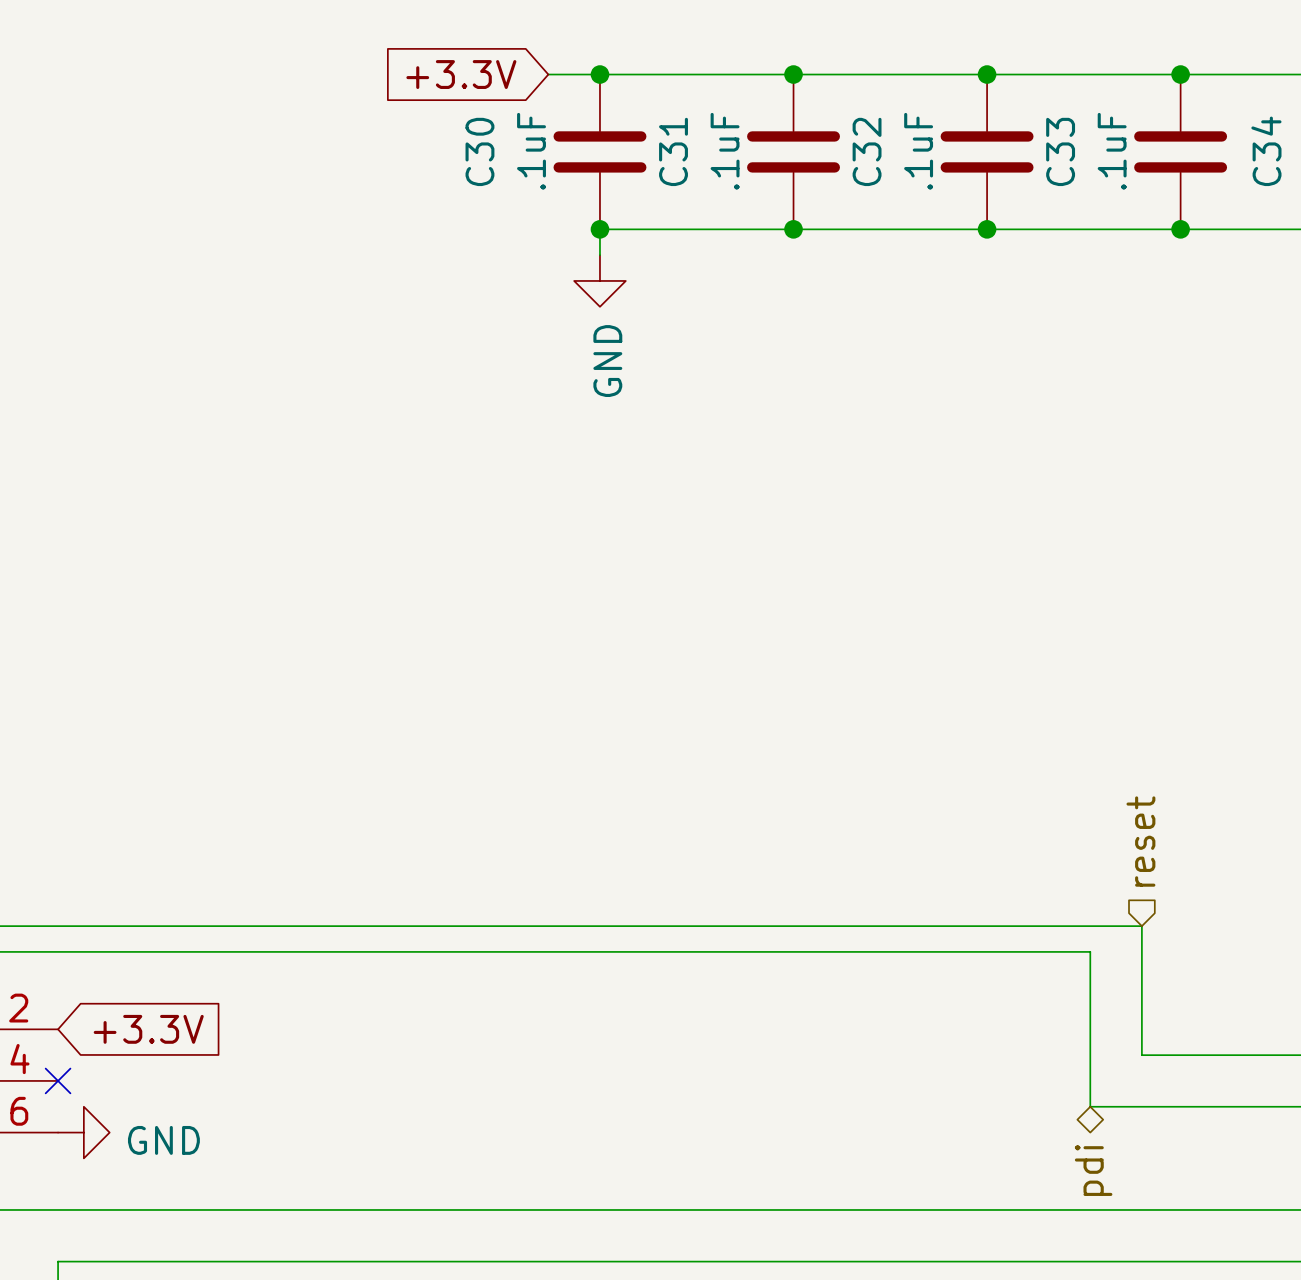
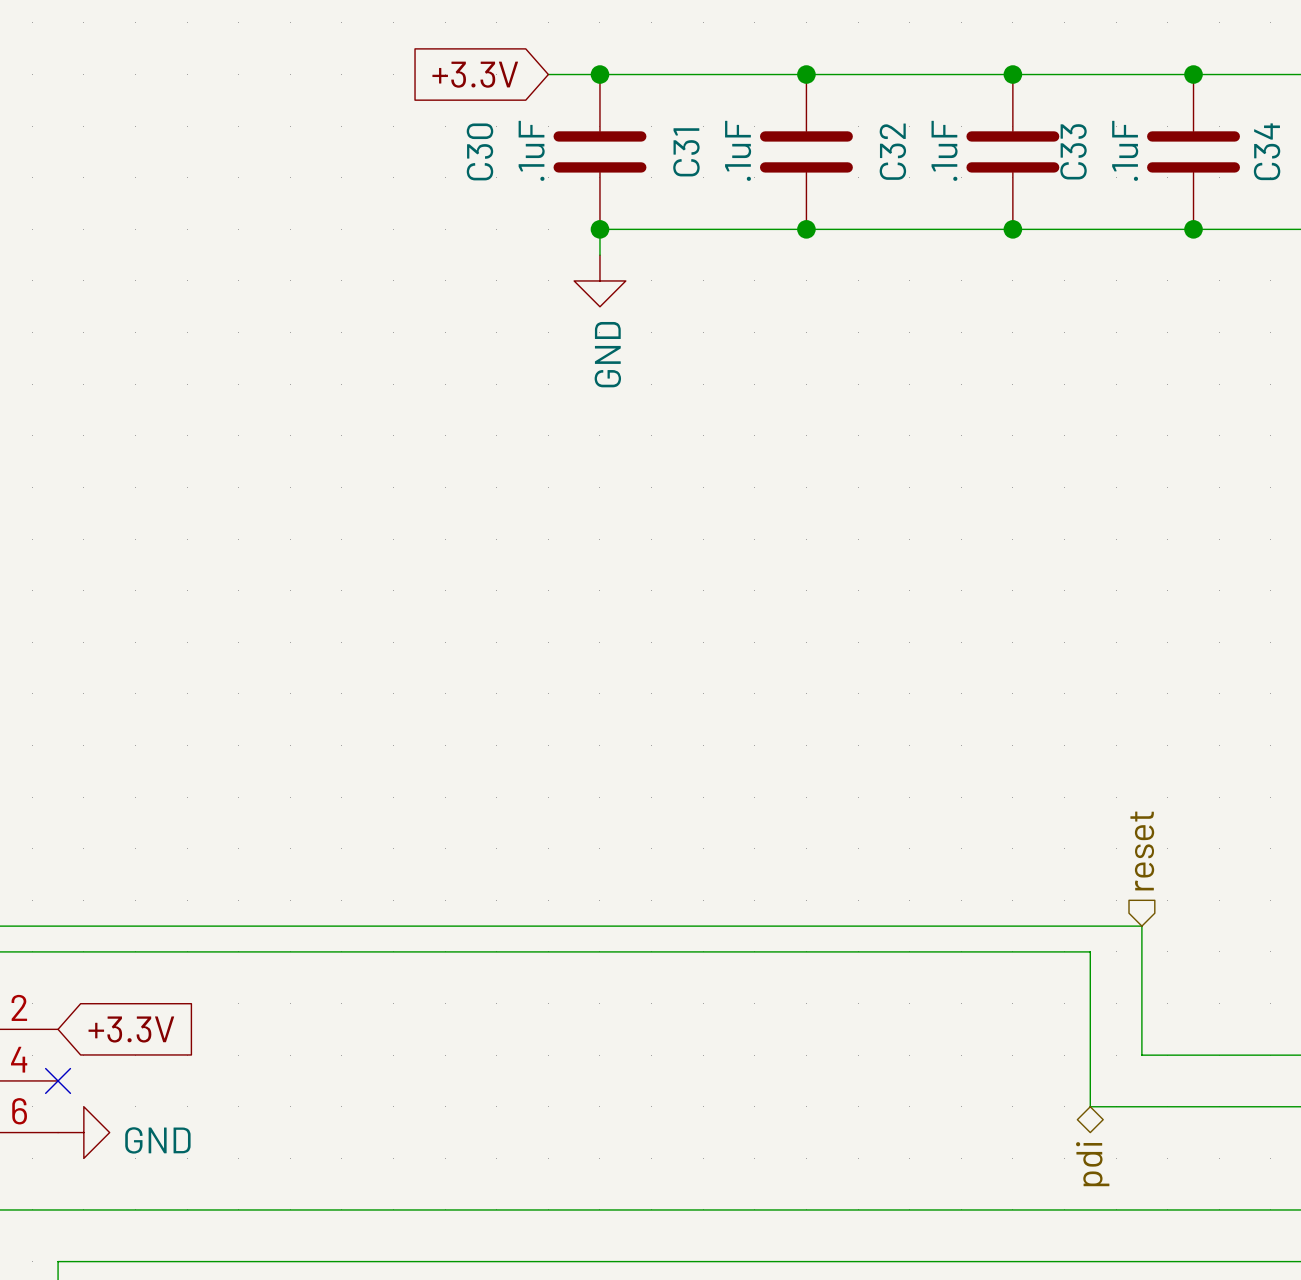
junction position: (793, 74) -> (806, 74)
junction position: (987, 74) -> (1012, 74)
junction position: (1180, 74) -> (1193, 74)
C31 position: (793, 151) -> (806, 151)
C32 position: (987, 151) -> (1012, 151)
C33 position: (1180, 151) -> (1193, 151)
junction position: (793, 229) -> (806, 229)
junction position: (987, 229) -> (1012, 229)
junction position: (1180, 229) -> (1193, 229)

